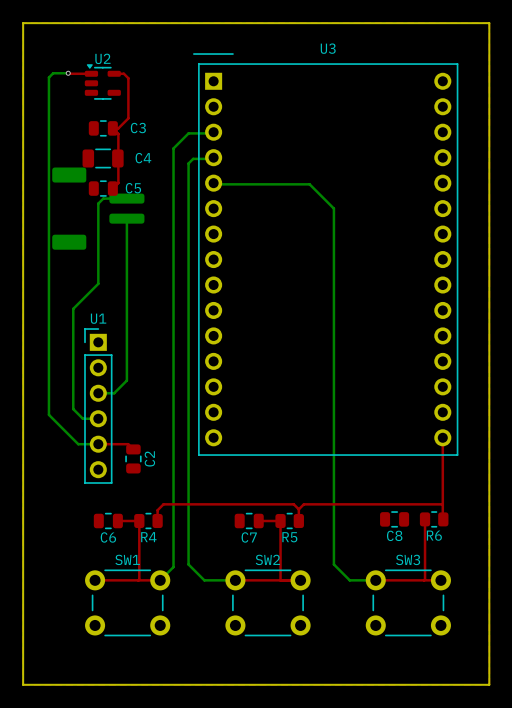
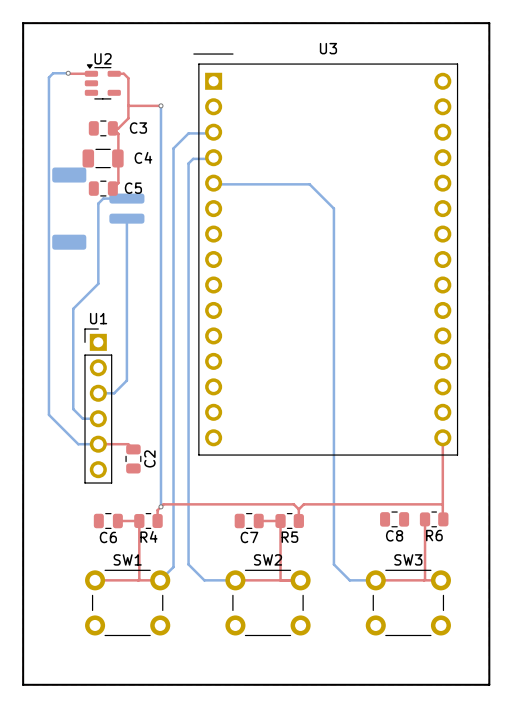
top track: none -> (128, 105) (160, 105)
bottom track: none -> (160, 105) (160, 506)
via: none -> (160, 105)
via: none -> (160, 506)

